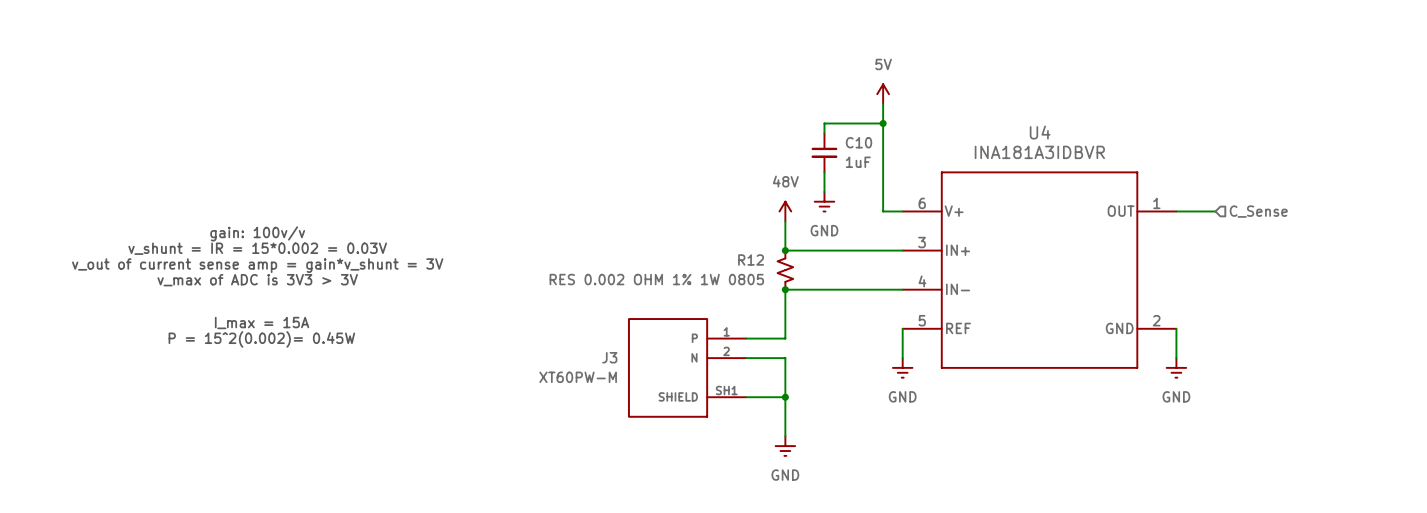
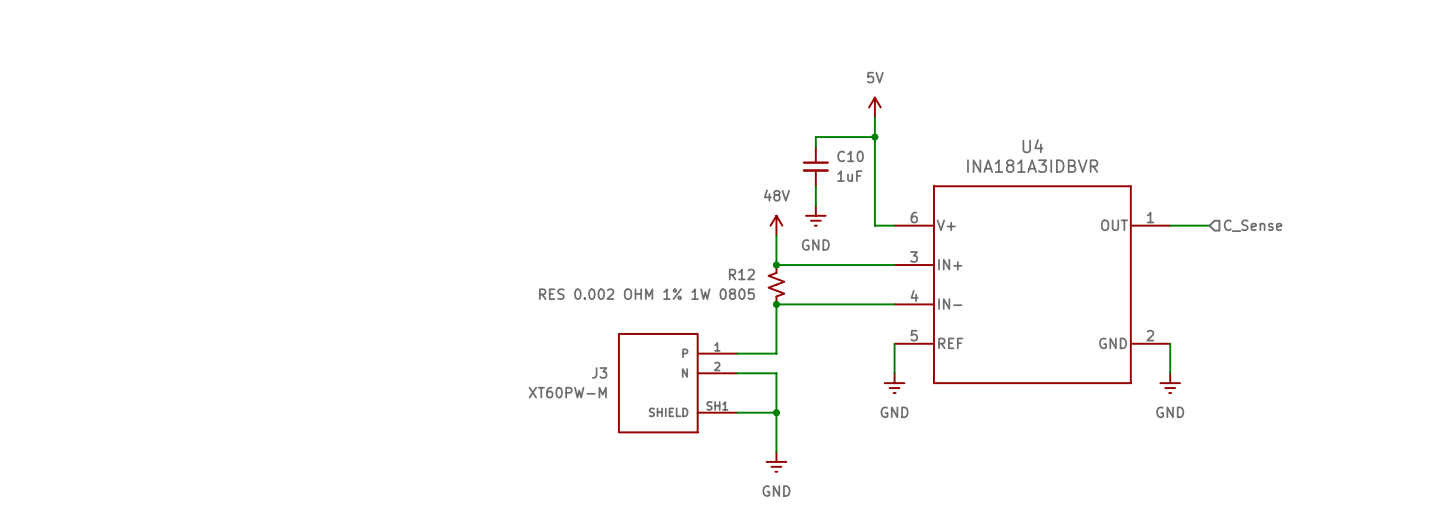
text: gain: 100v/v (257, 233) -> none
text: v_shunt = IR = 15*0.002 = 0.03V (257, 248) -> none
text: v_out of current sense amp = gain*v_shunt = 3V (257, 265) -> none
text: v_max of ADC is 3V3 > 3V (257, 280) -> none
text: I_max = 15A (262, 323) -> none
text: P = 15^2(0.002)= 0.45W (261, 339) -> none

